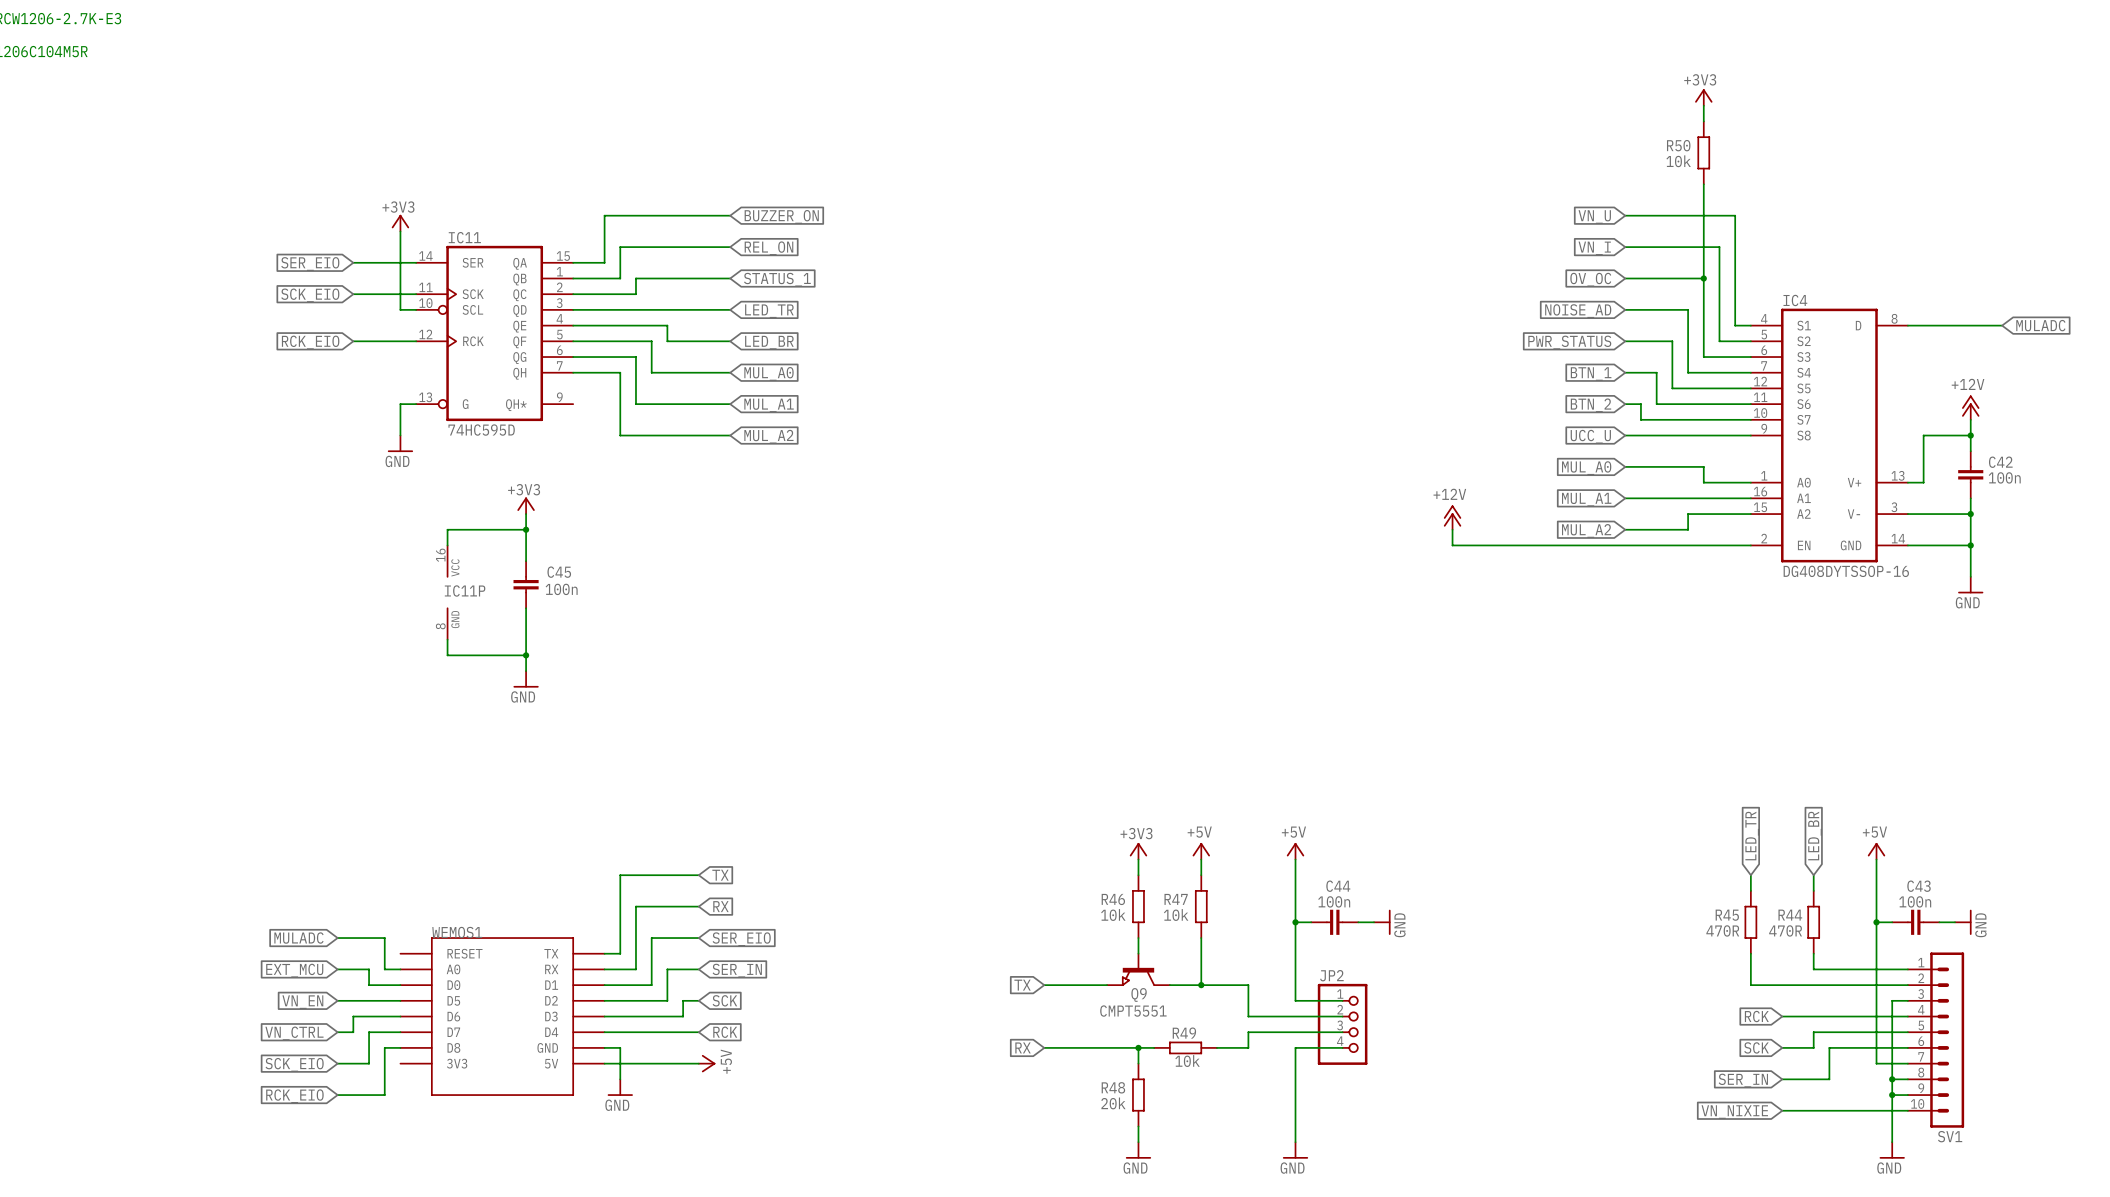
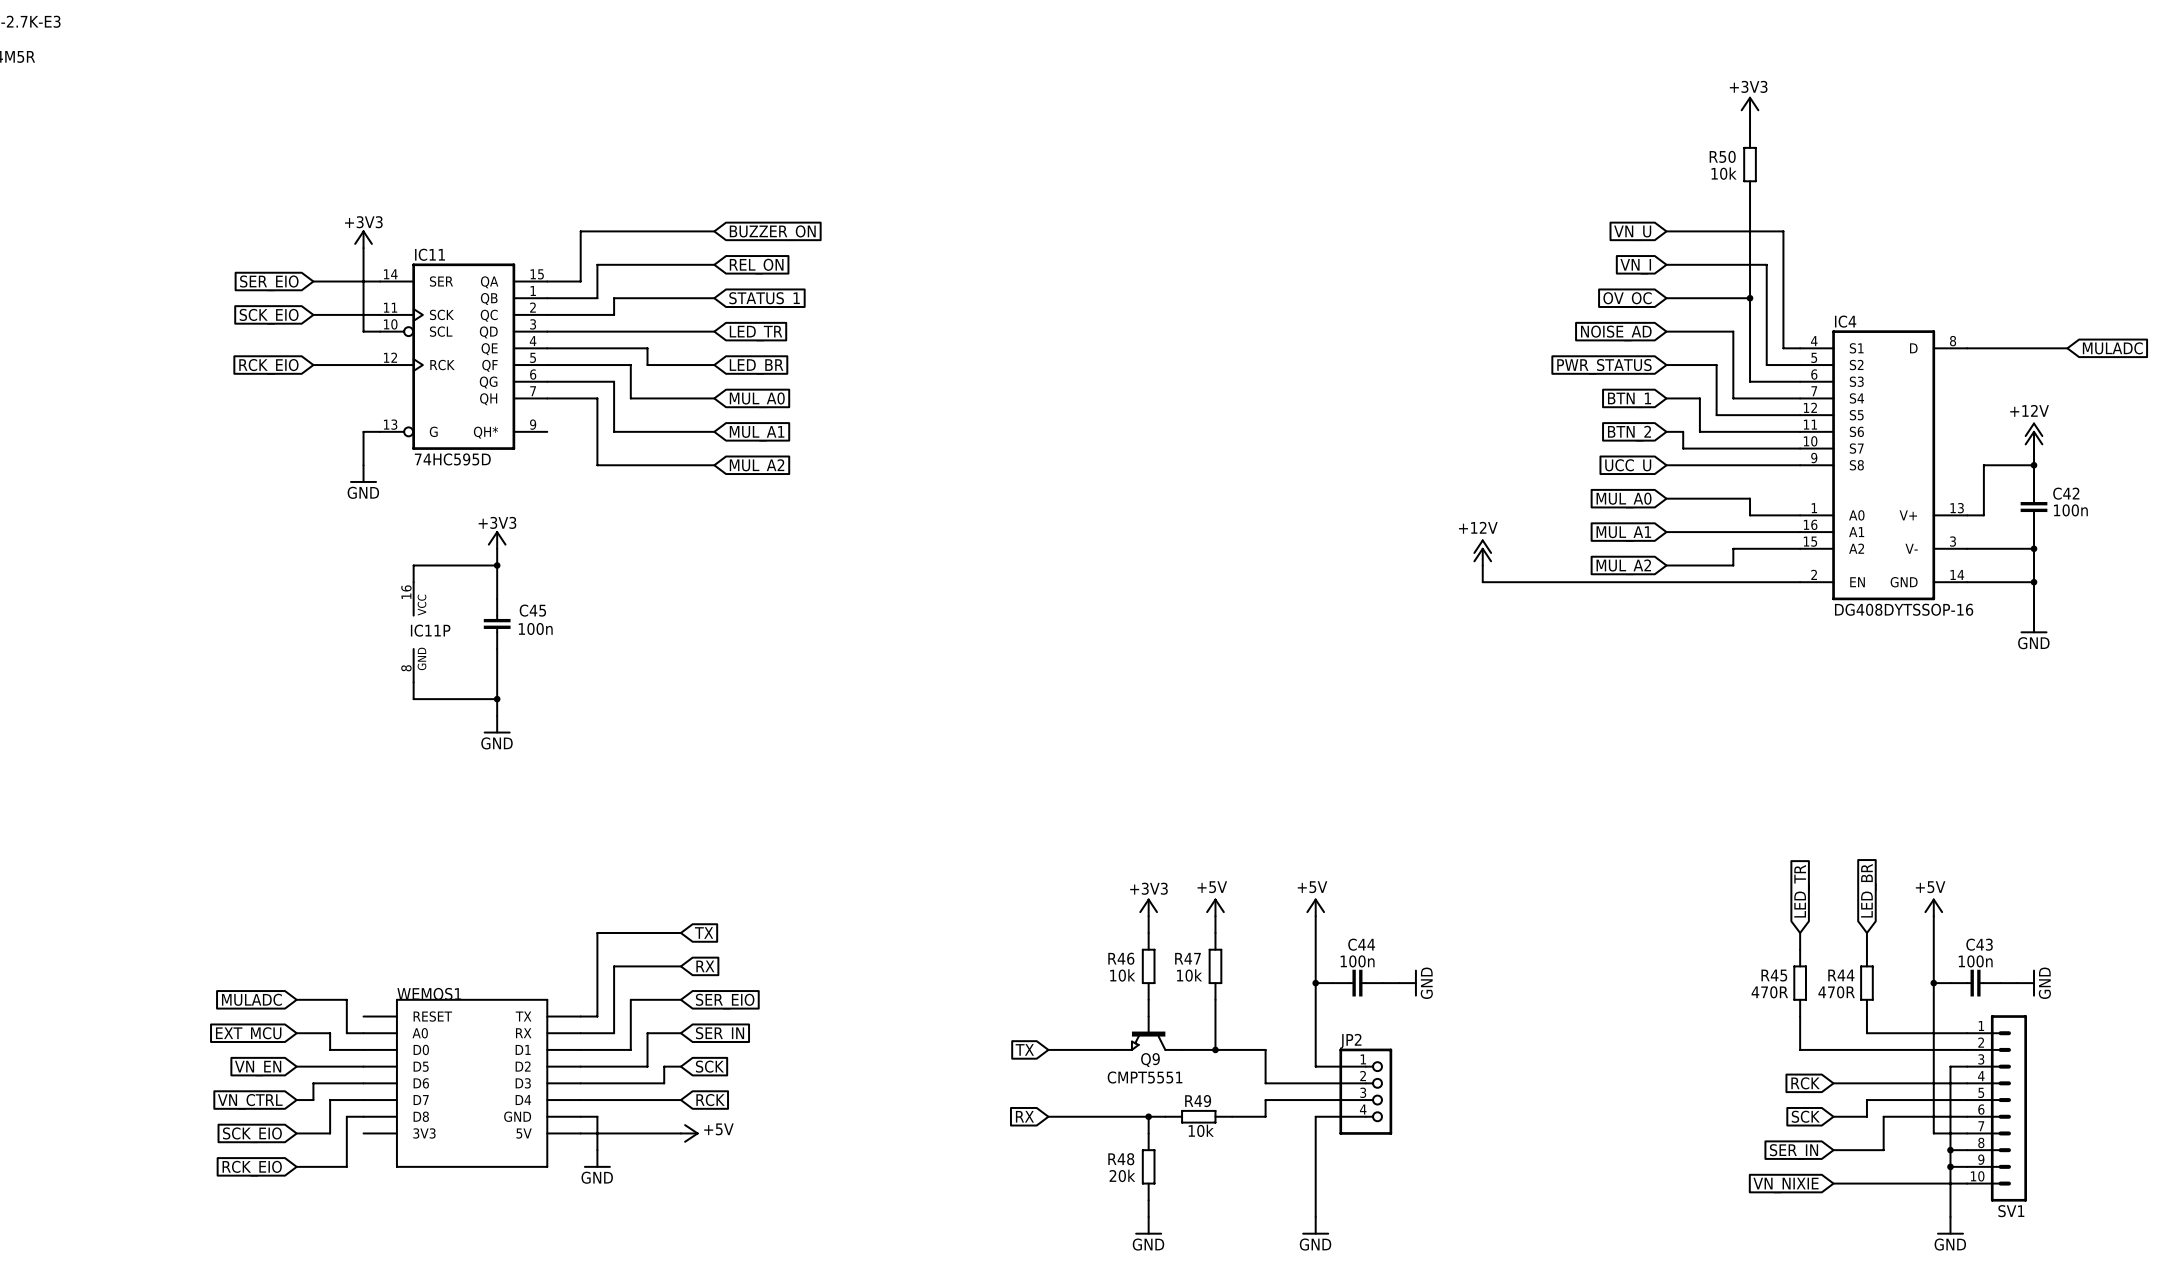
power symbol text rotation: 0° (726, 1061) -> 90° clockwise (718, 1129)

